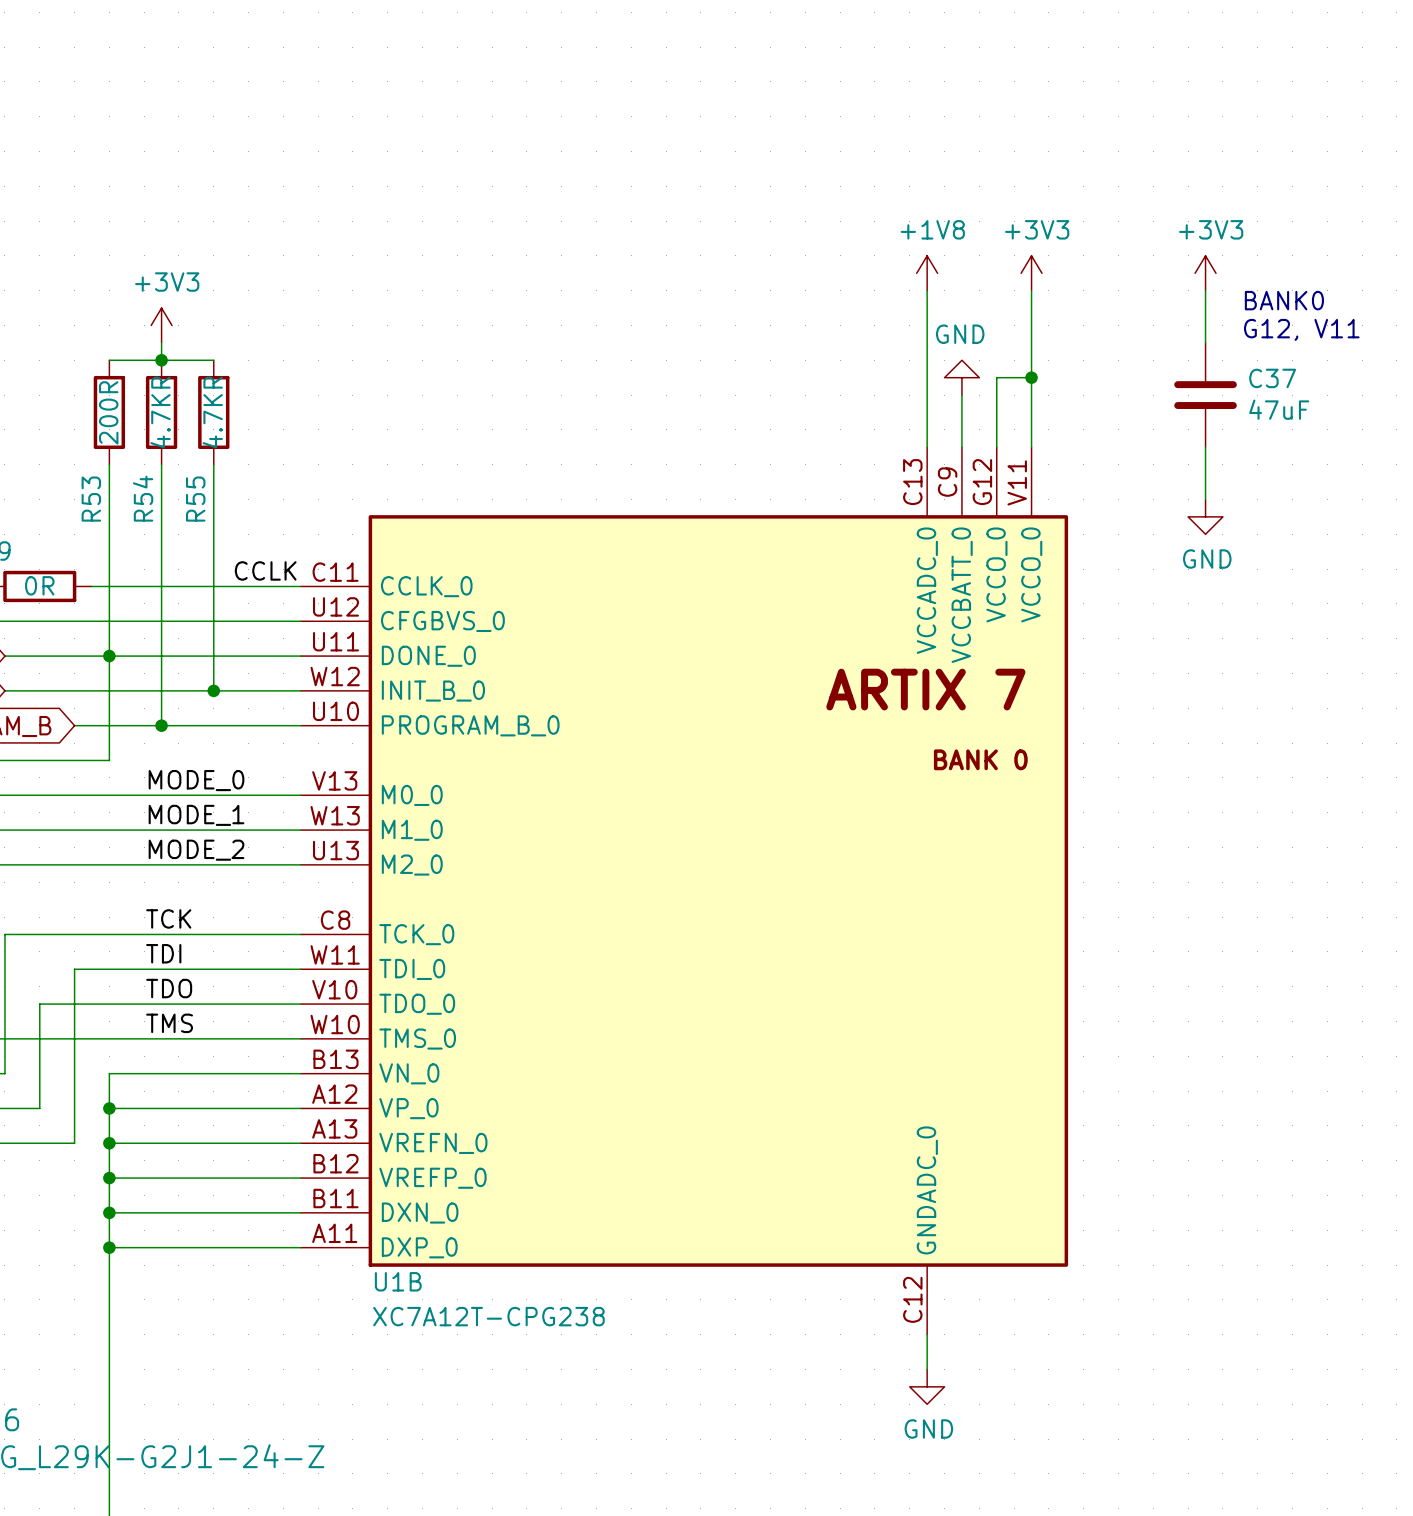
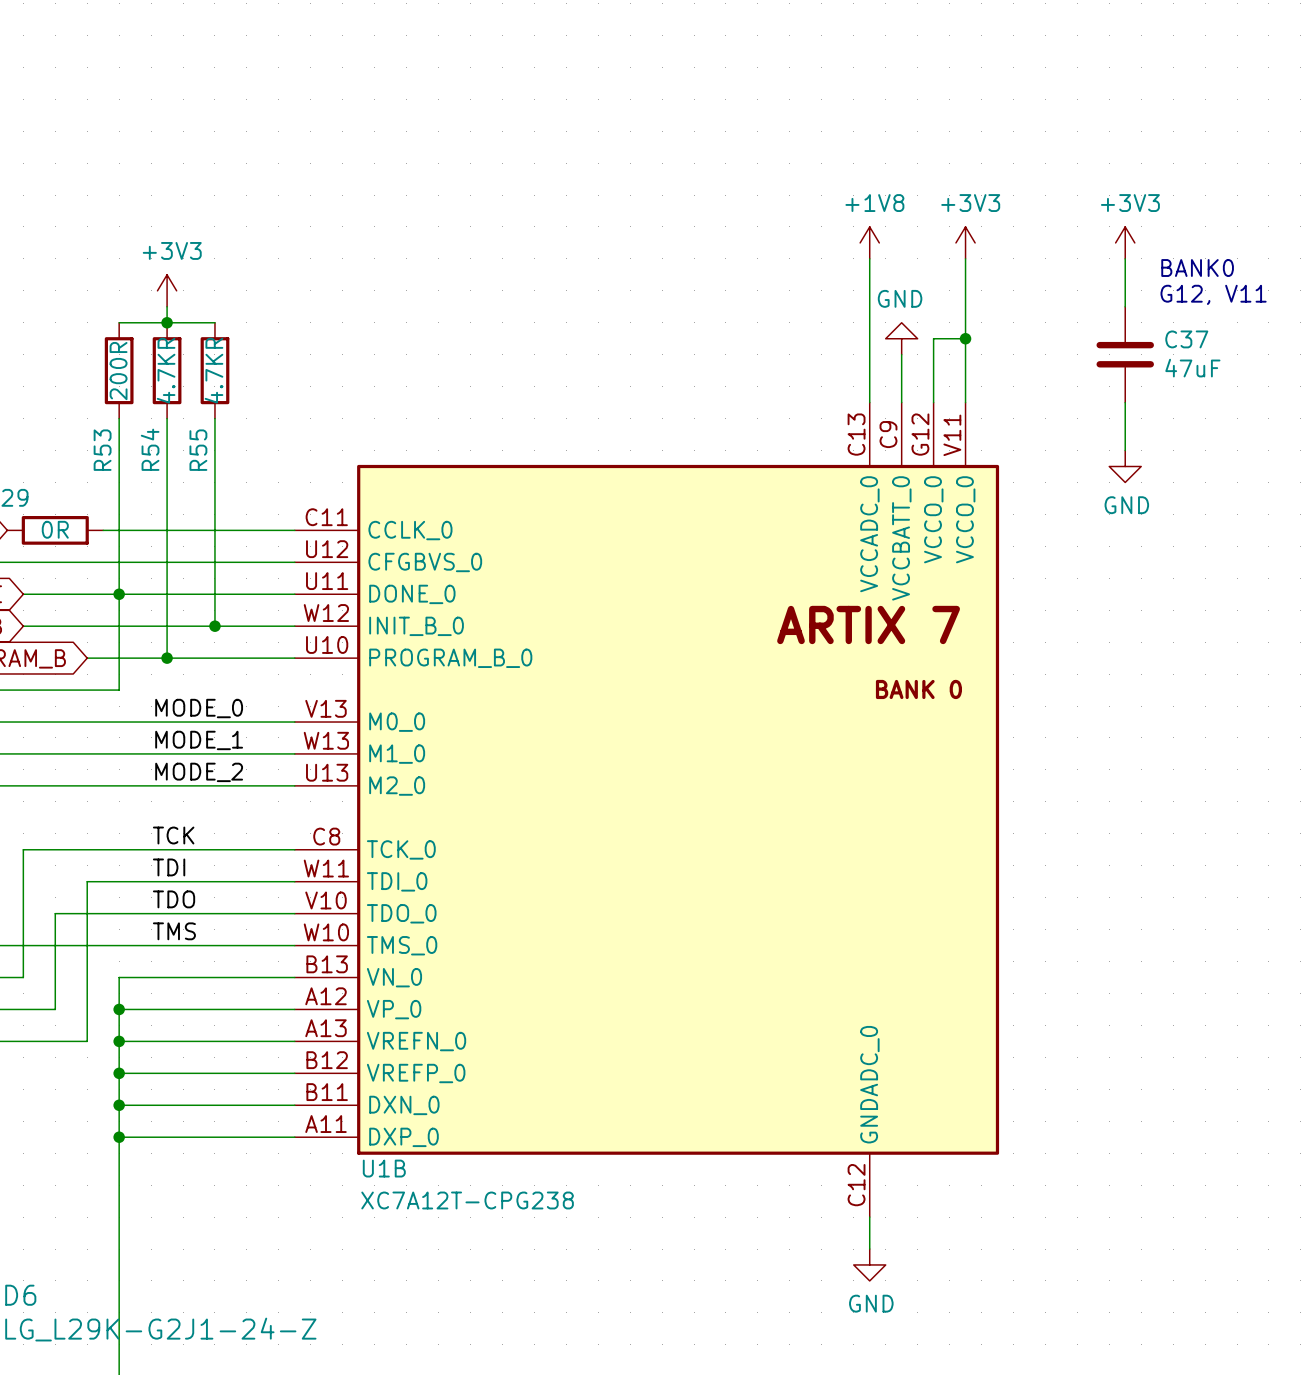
label: CCLK (265, 570) -> none

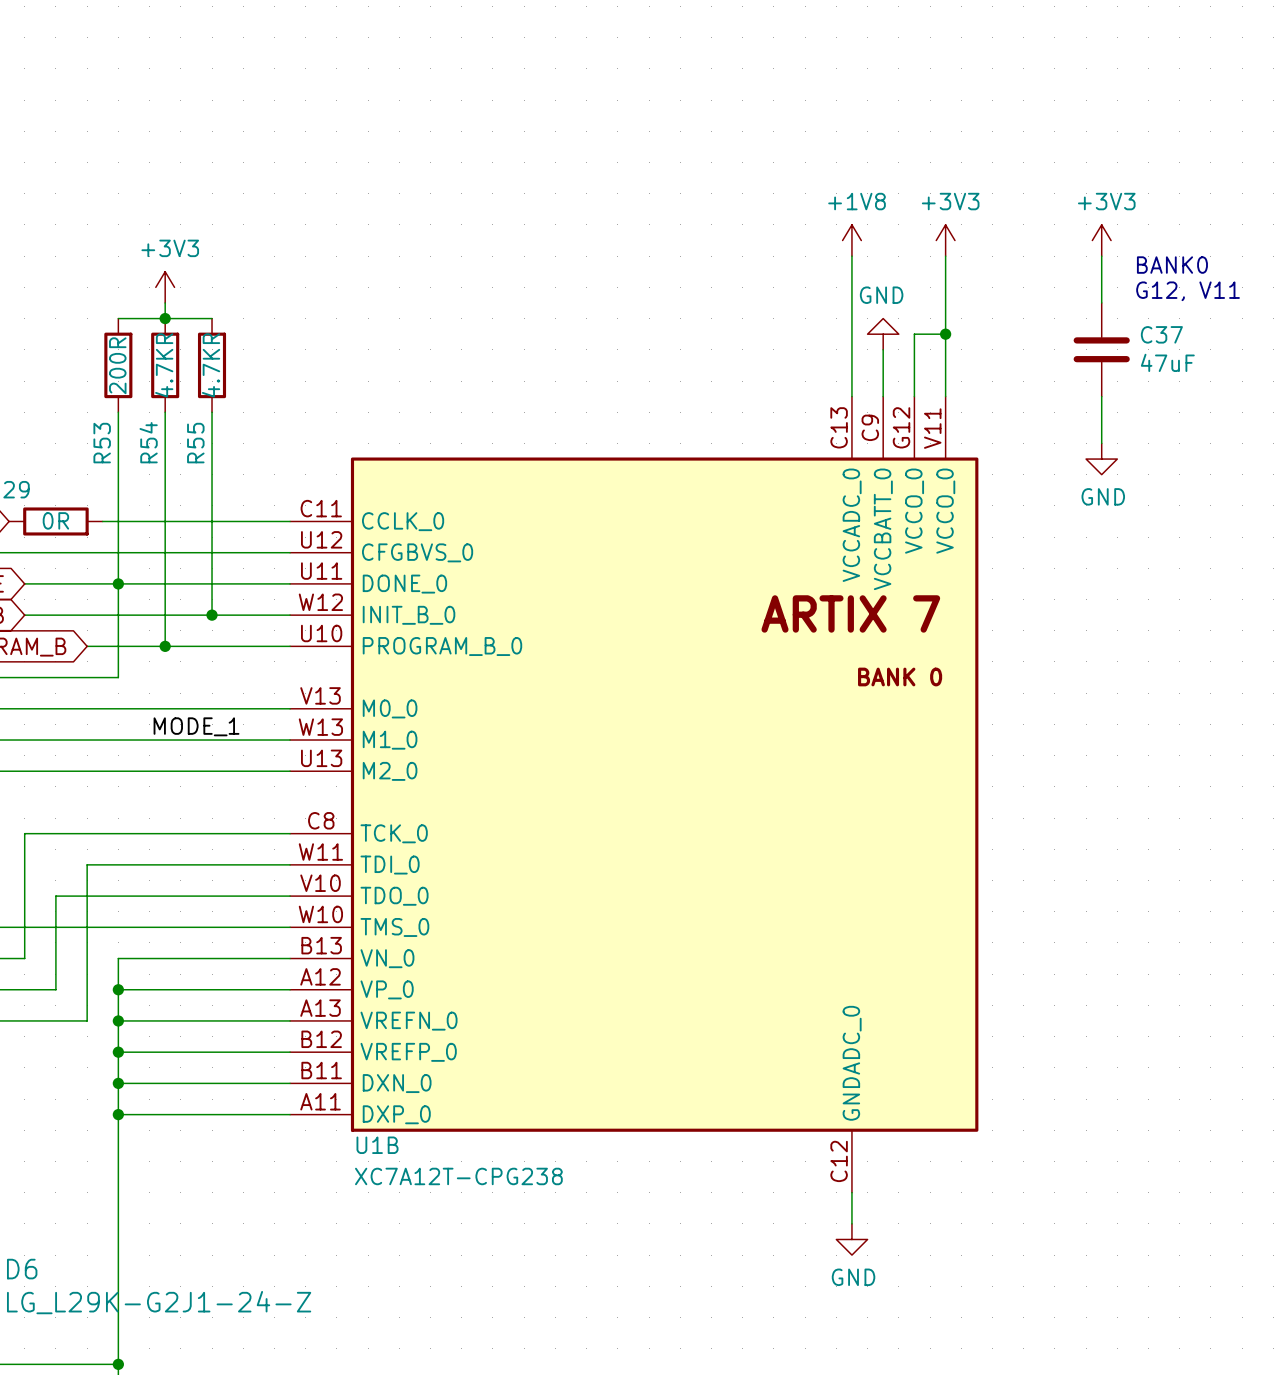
label: MODE_0 (199, 708) -> none
label: MODE_2 (199, 772) -> none
label: TCK (173, 835) -> none
label: TDI (169, 867) -> none
label: TDO (174, 899) -> none
label: TMS (174, 931) -> none

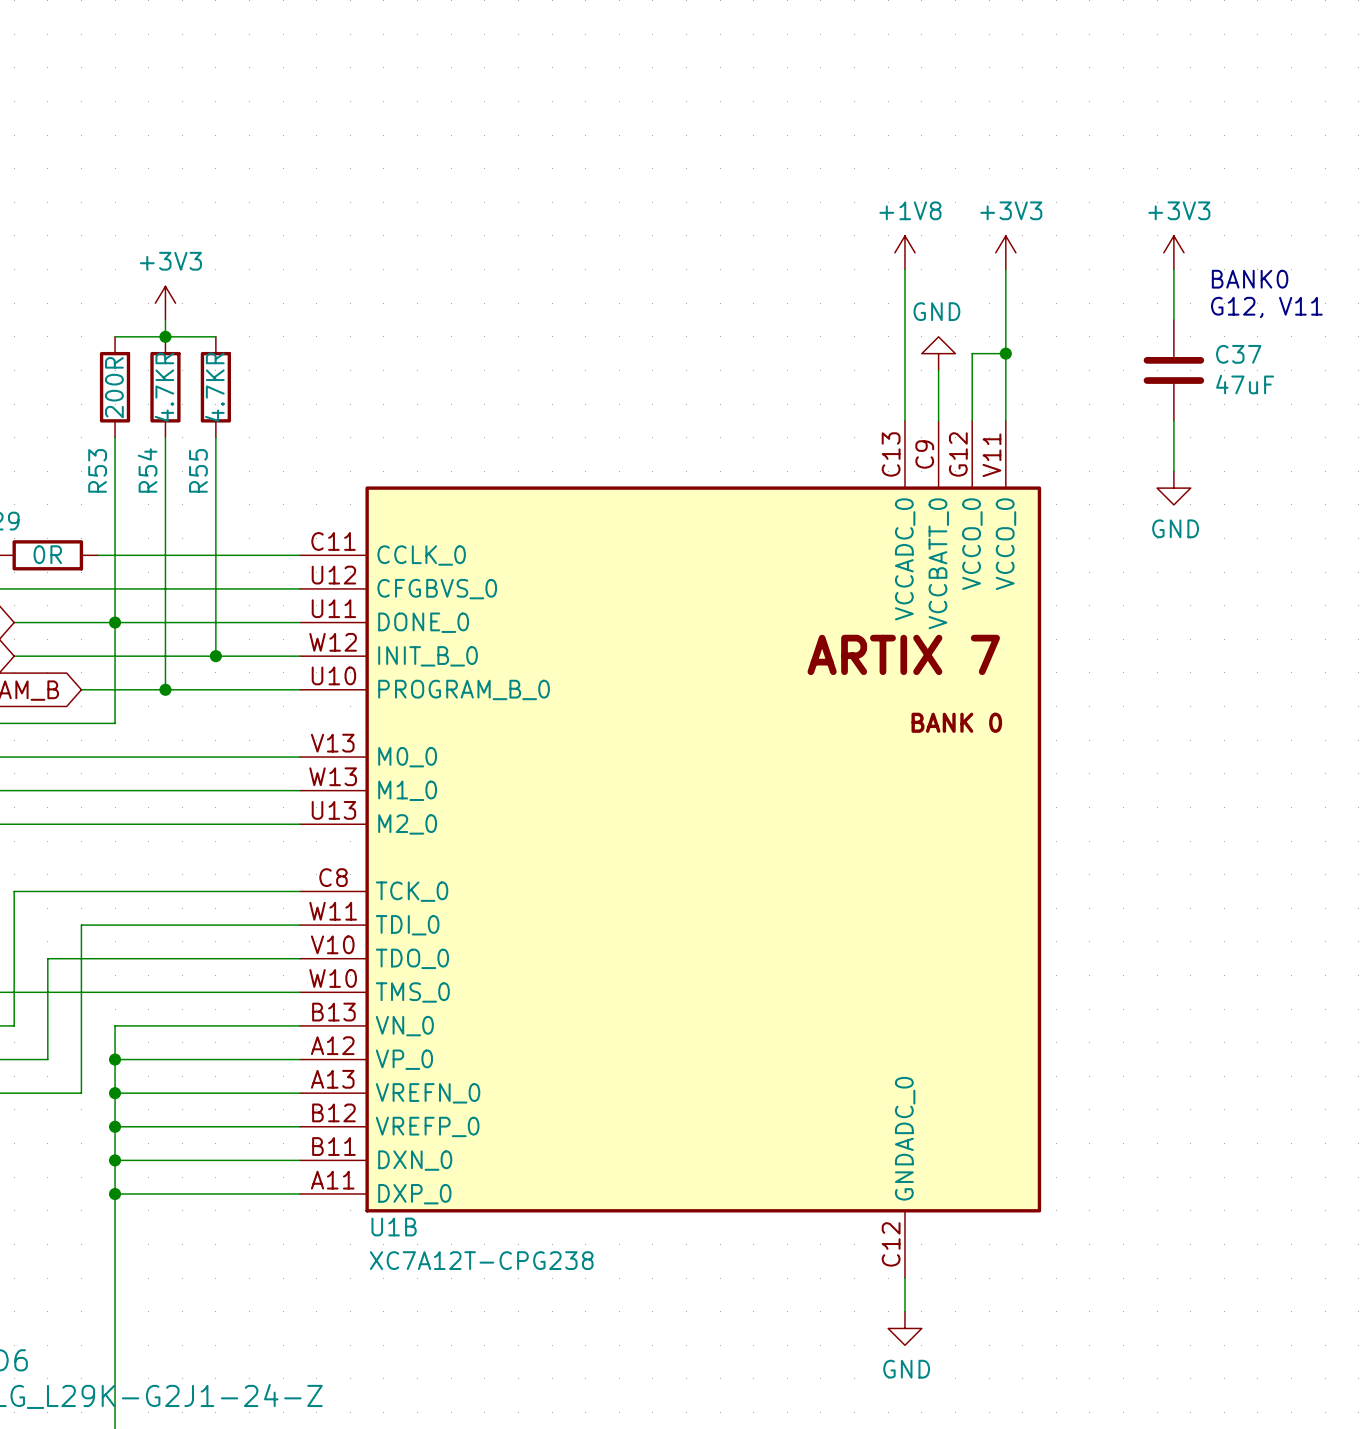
label: MODE_1 (196, 726) -> none

